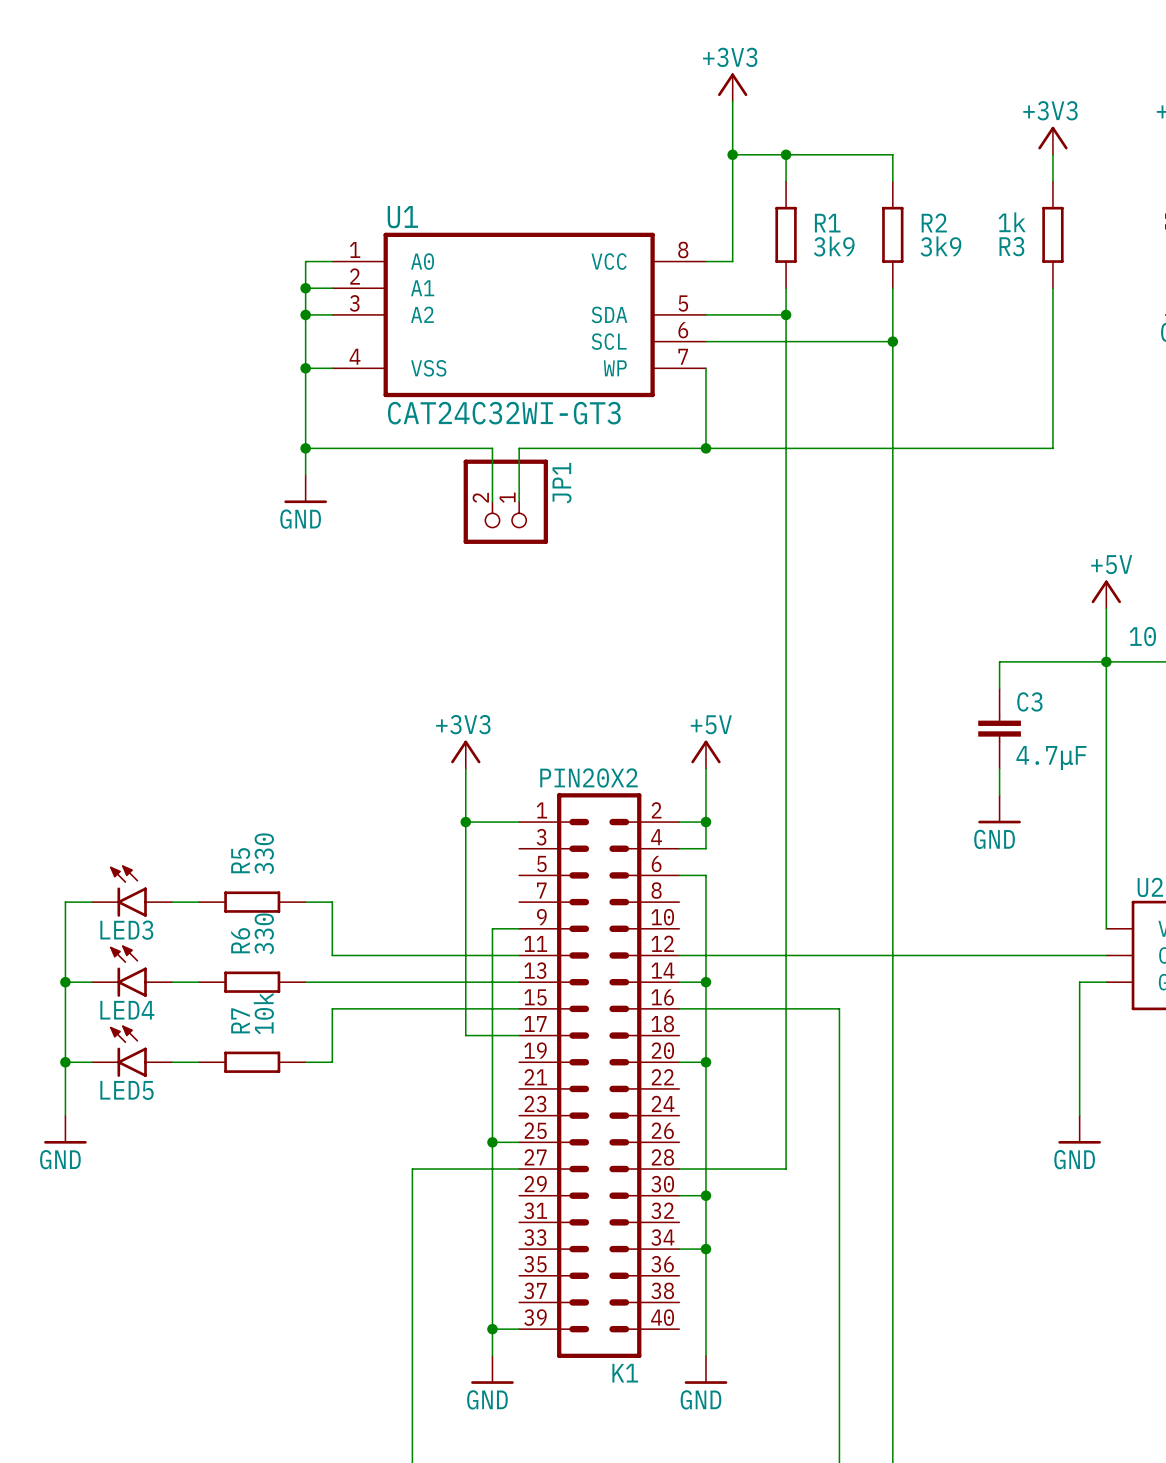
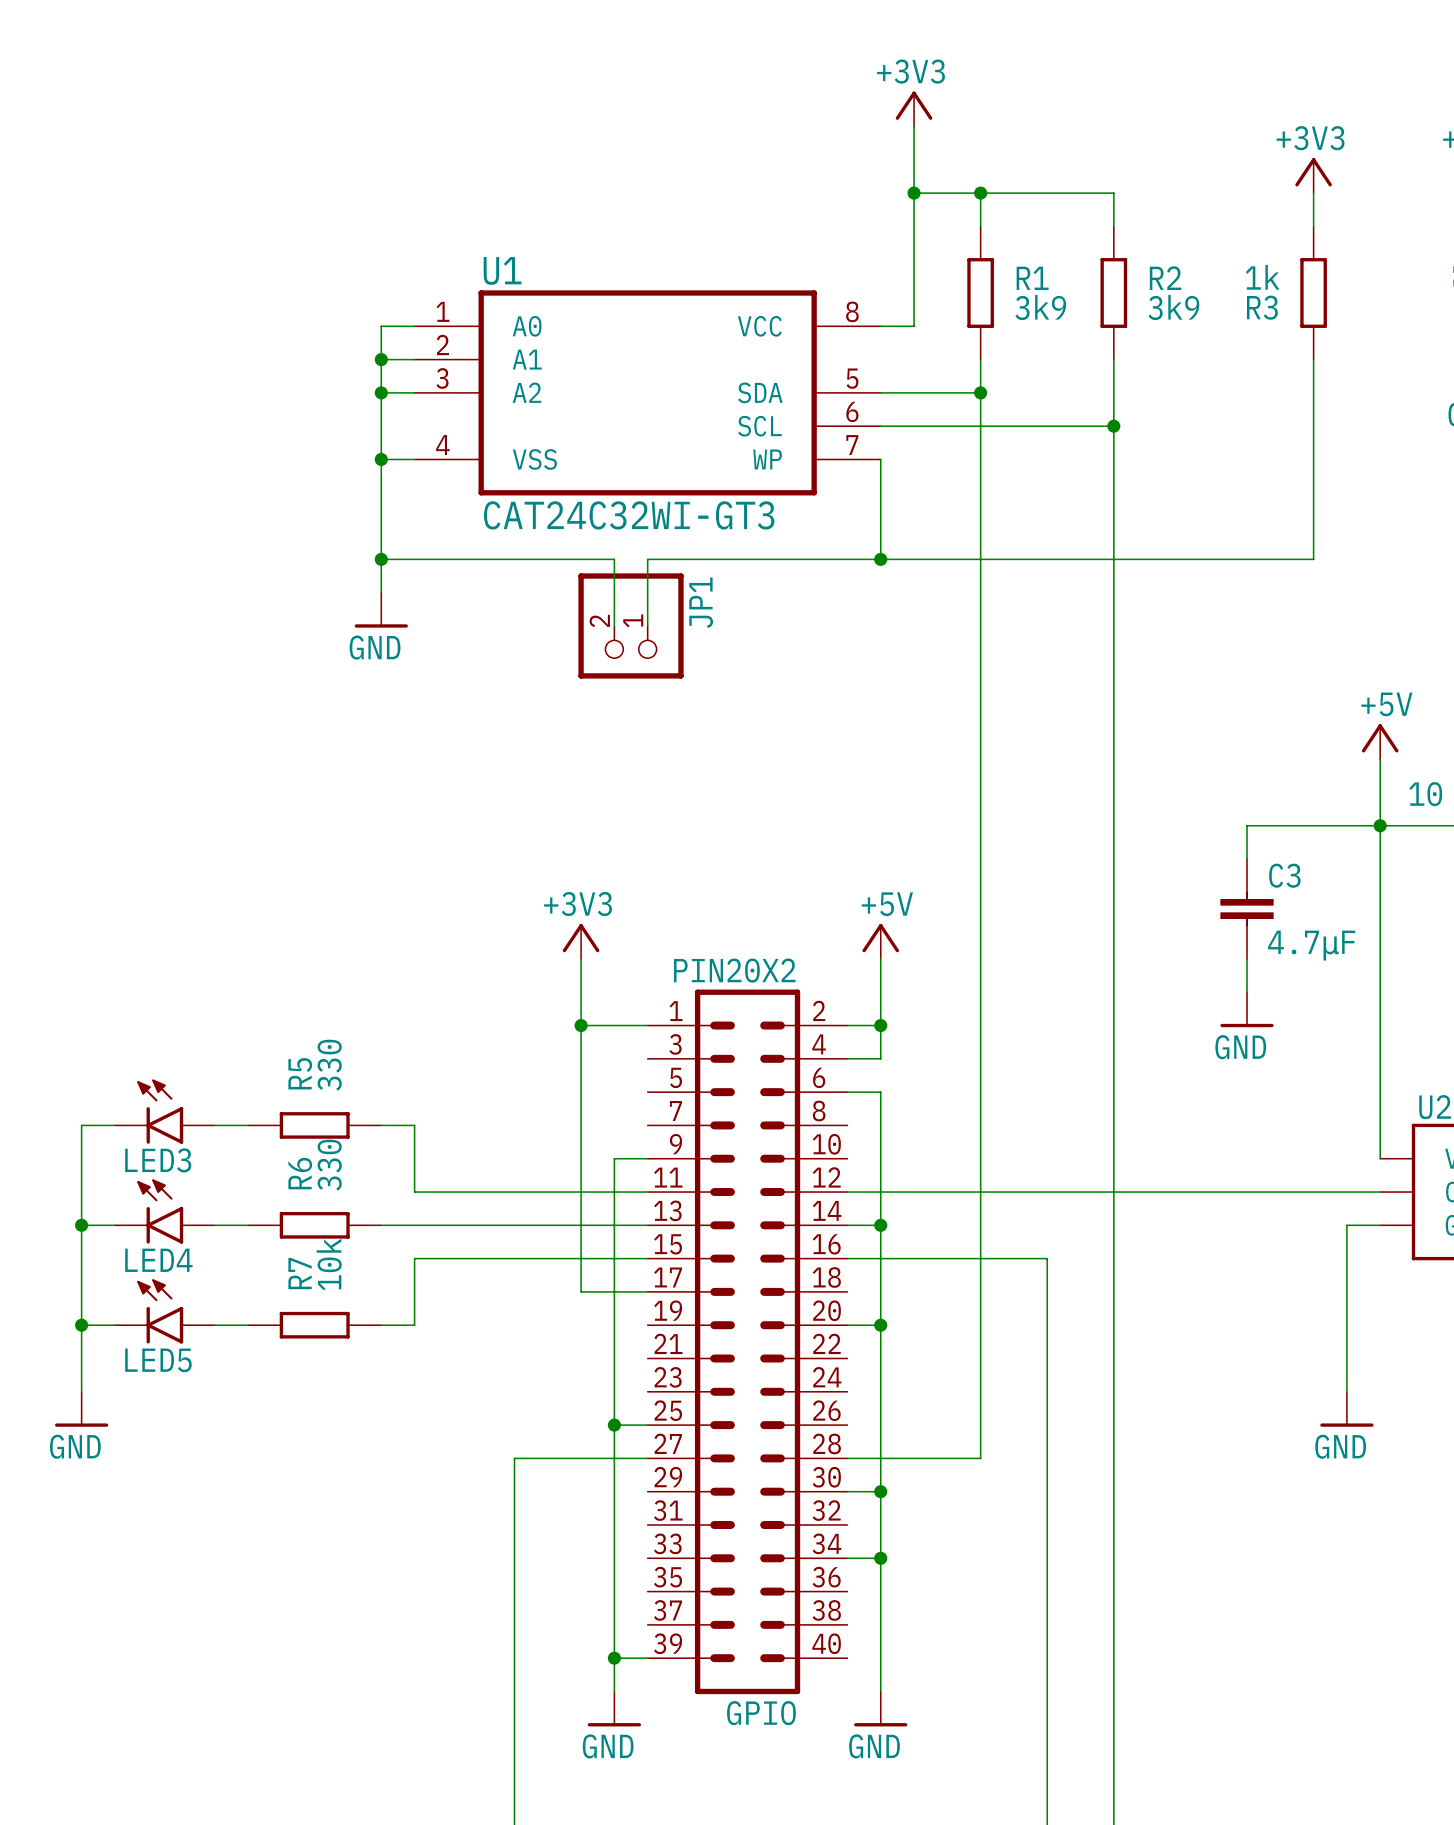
K1 name: K1 (625, 1373) -> GPIO (761, 1713)

